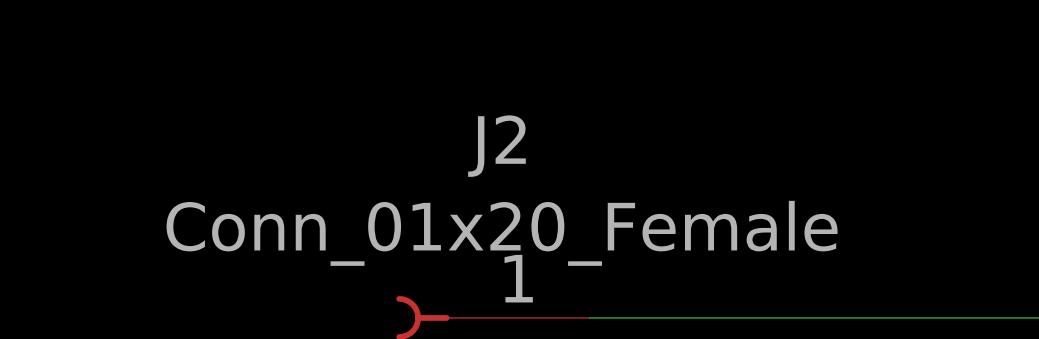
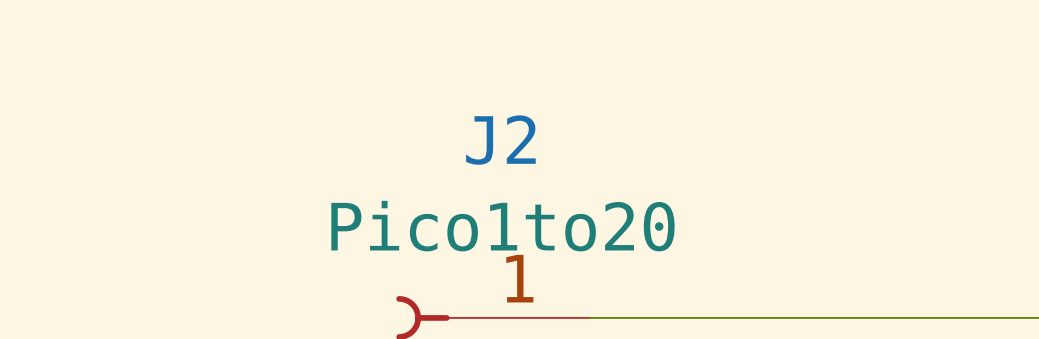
J2 value: Conn_01x20_Female (502, 233) -> Pico1to20 (502, 226)

